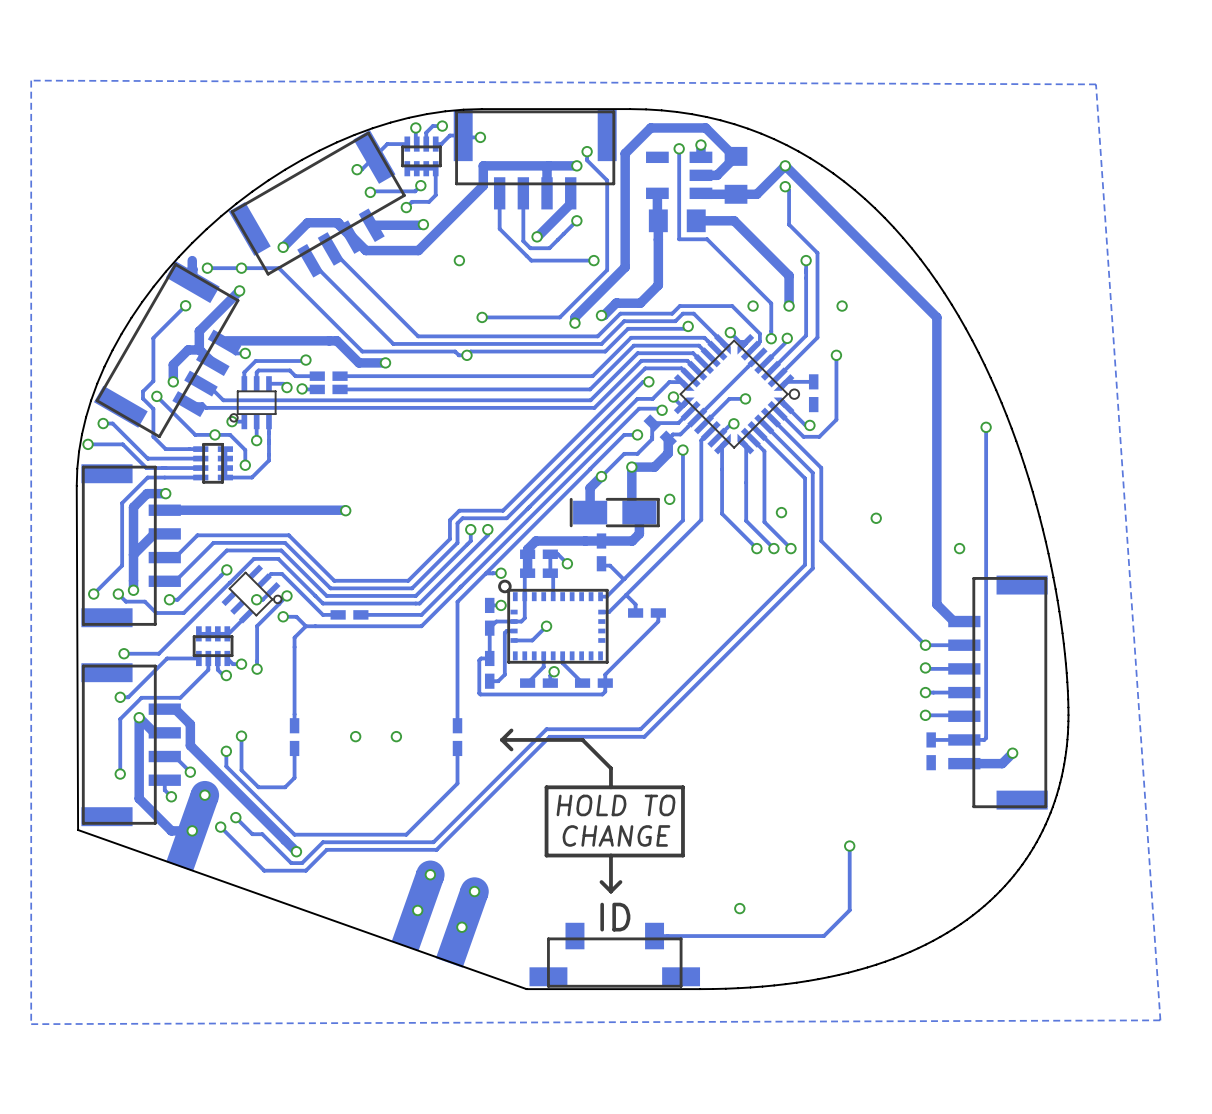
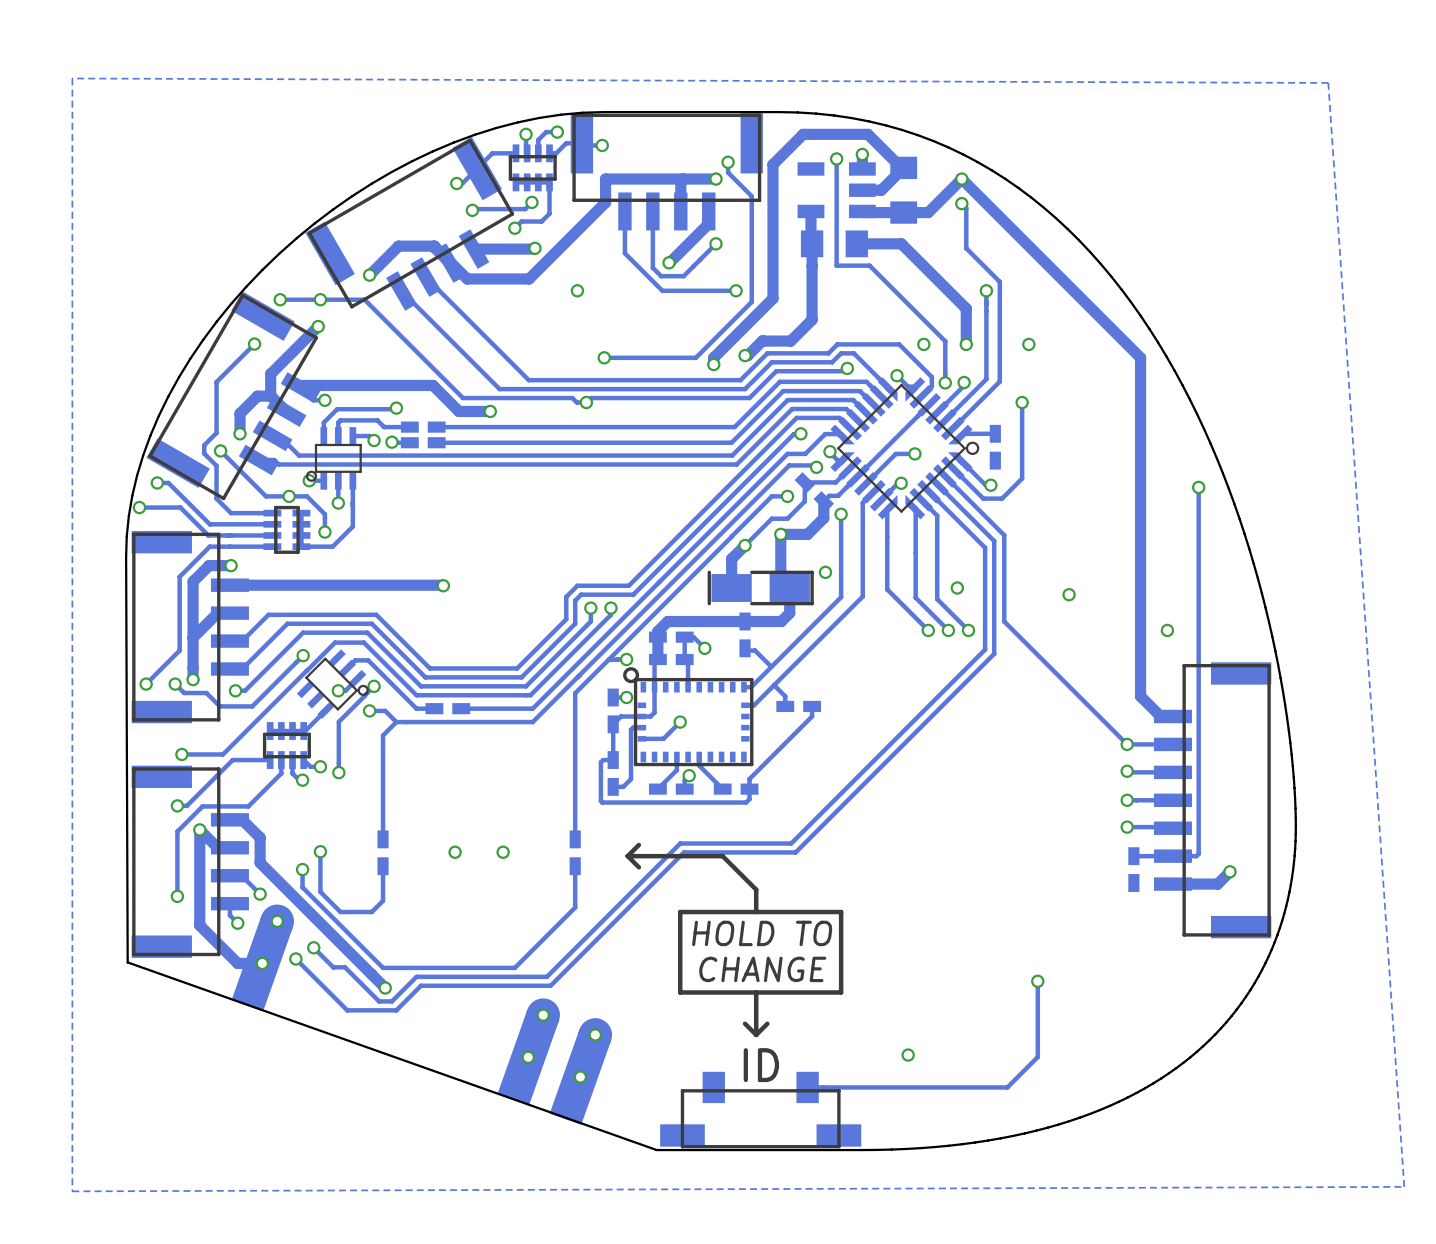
track: (192, 260) (192, 282) -> none

